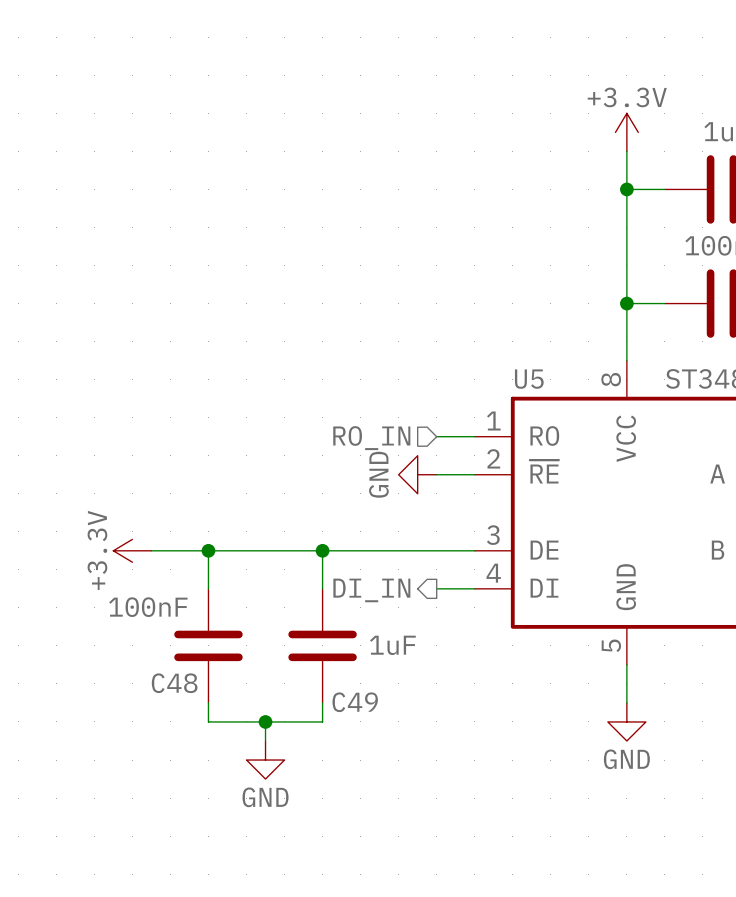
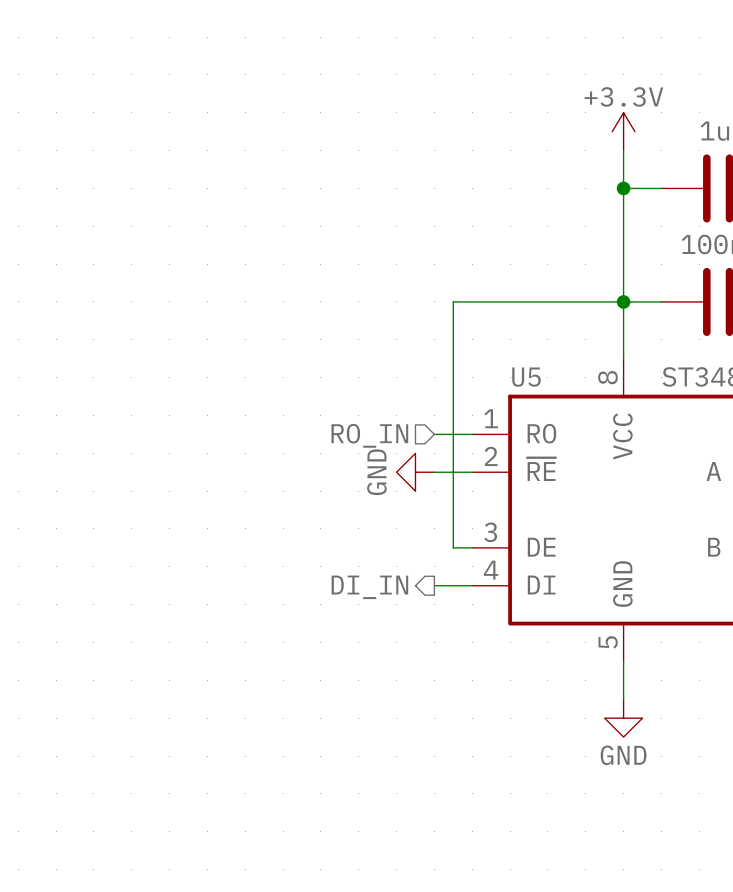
power symbol: +3.3V (132, 550) -> none
wire: (151, 550) (455, 550) -> (623, 301) (453, 301) (453, 547)
wire: (208, 550) (208, 588) -> none
junction: (208, 550) -> none
wire: (322, 550) (322, 588) -> none
junction: (322, 550) -> none
C48: 100nF (208, 645) -> none
C49: 1uF (322, 645) -> none
wire: (208, 702) (208, 721) (322, 721) (322, 702) -> none
wire: (265, 721) (265, 741) -> none
junction: (265, 721) -> none
power symbol: GND (265, 760) -> none

